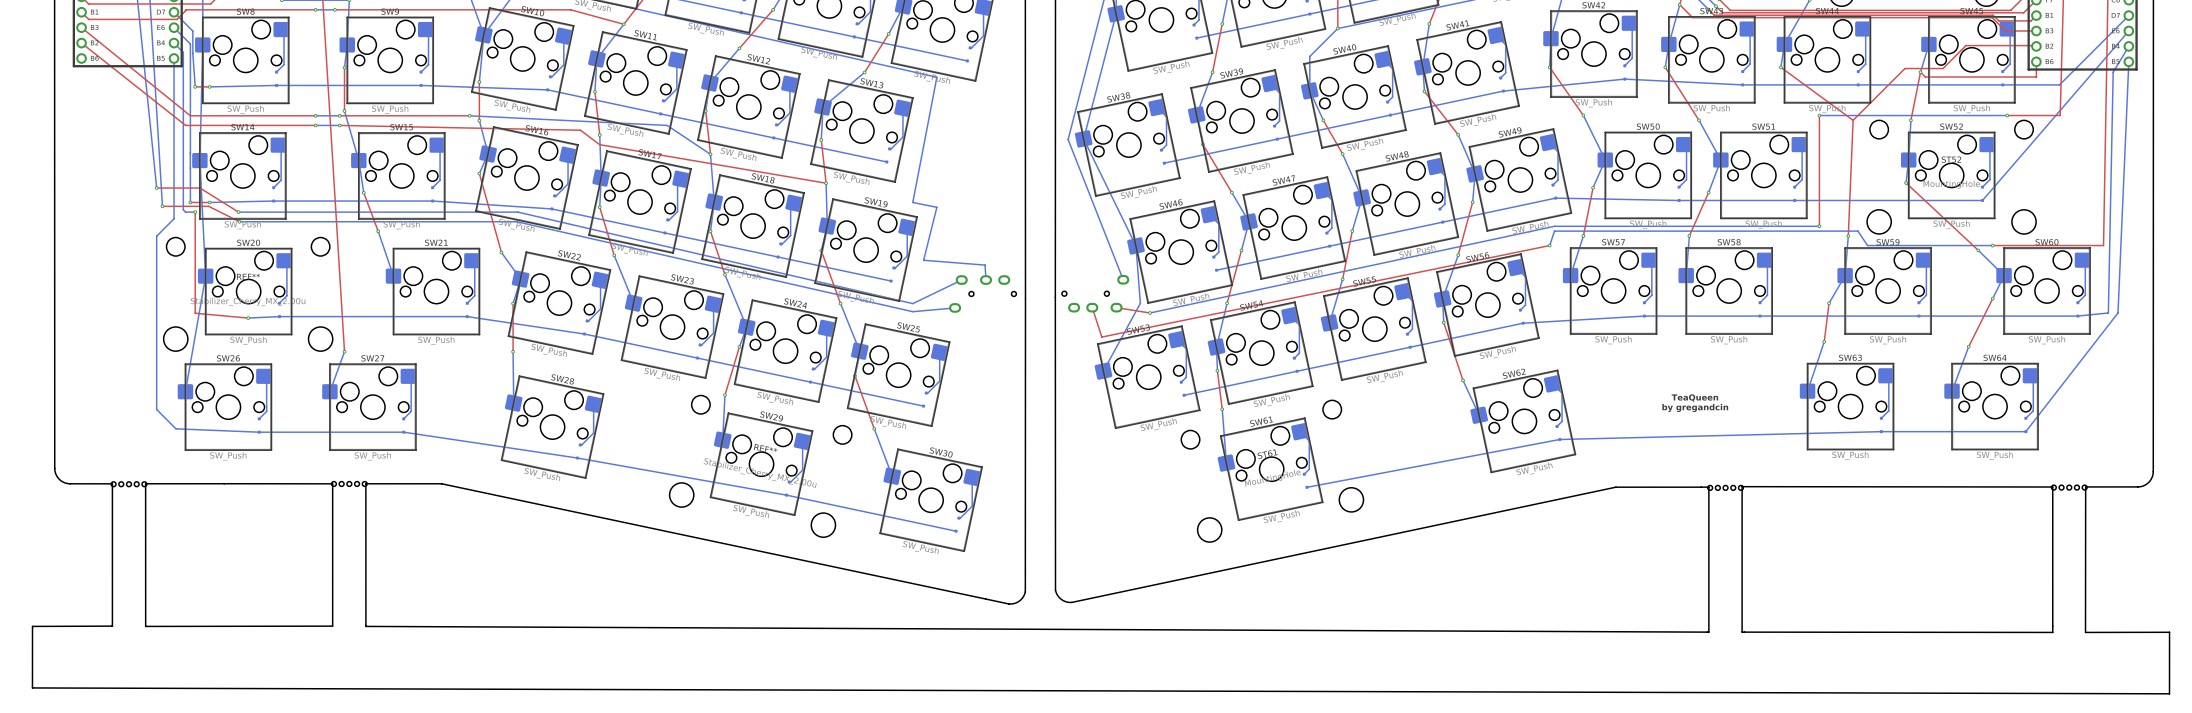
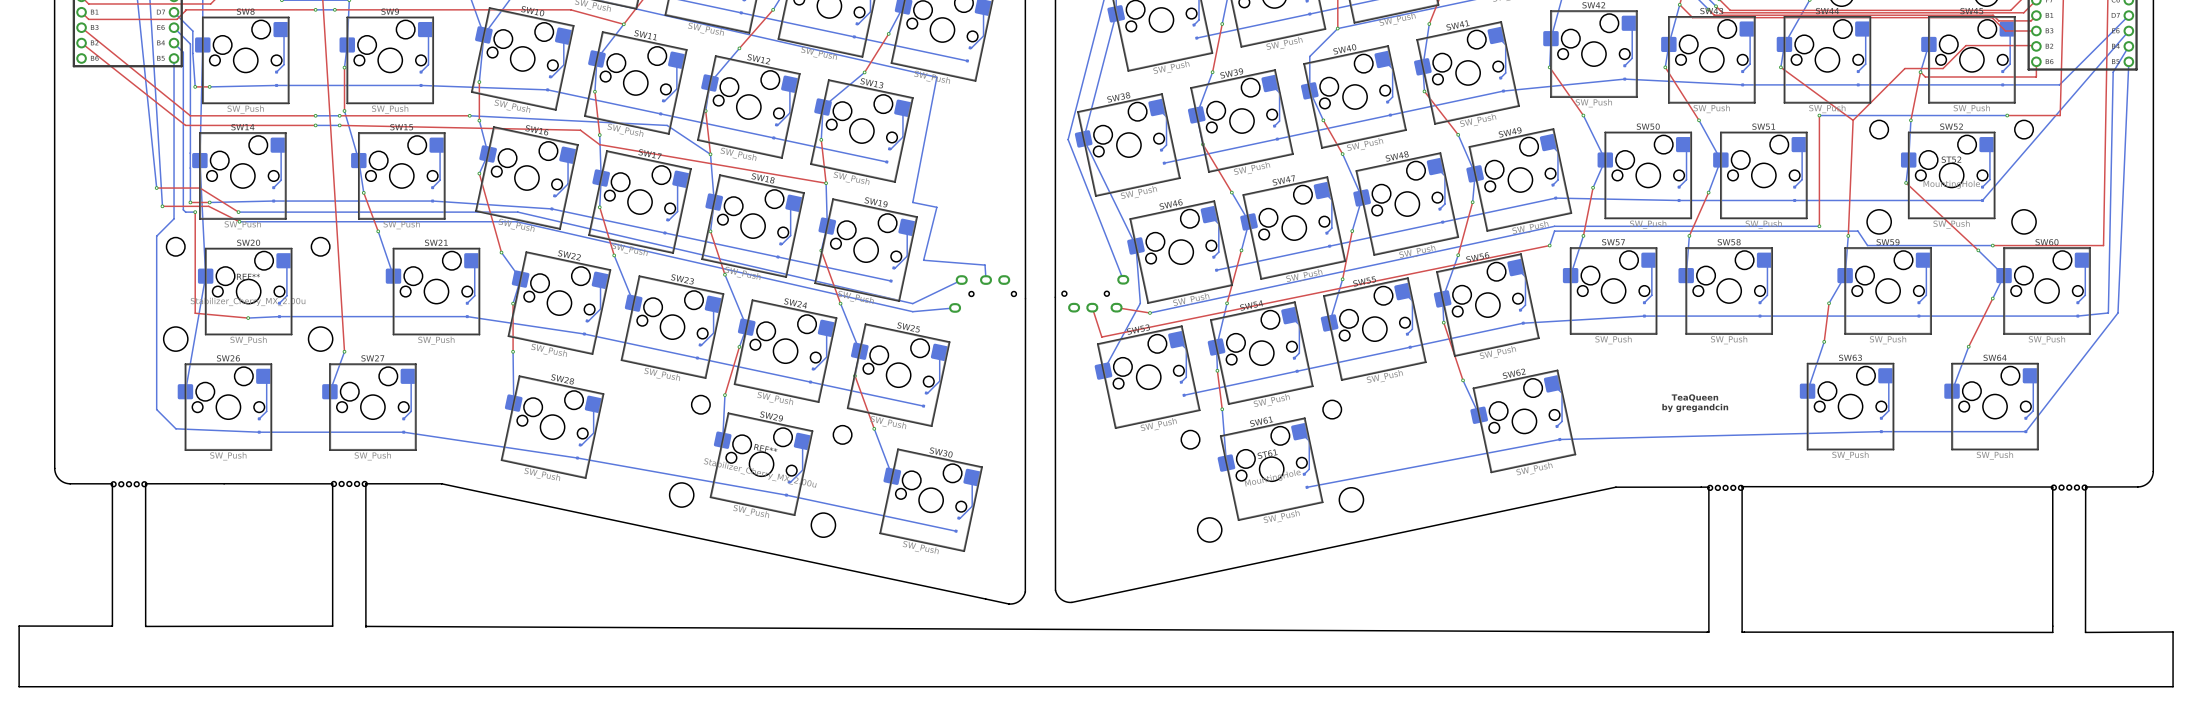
board edge: (112, 626) (32, 626) (32, 687) (2169, 693) (2169, 632) (2085, 632) -> (112, 626) (19, 626) (19, 686) (2173, 686) (2173, 631) (2085, 632)

